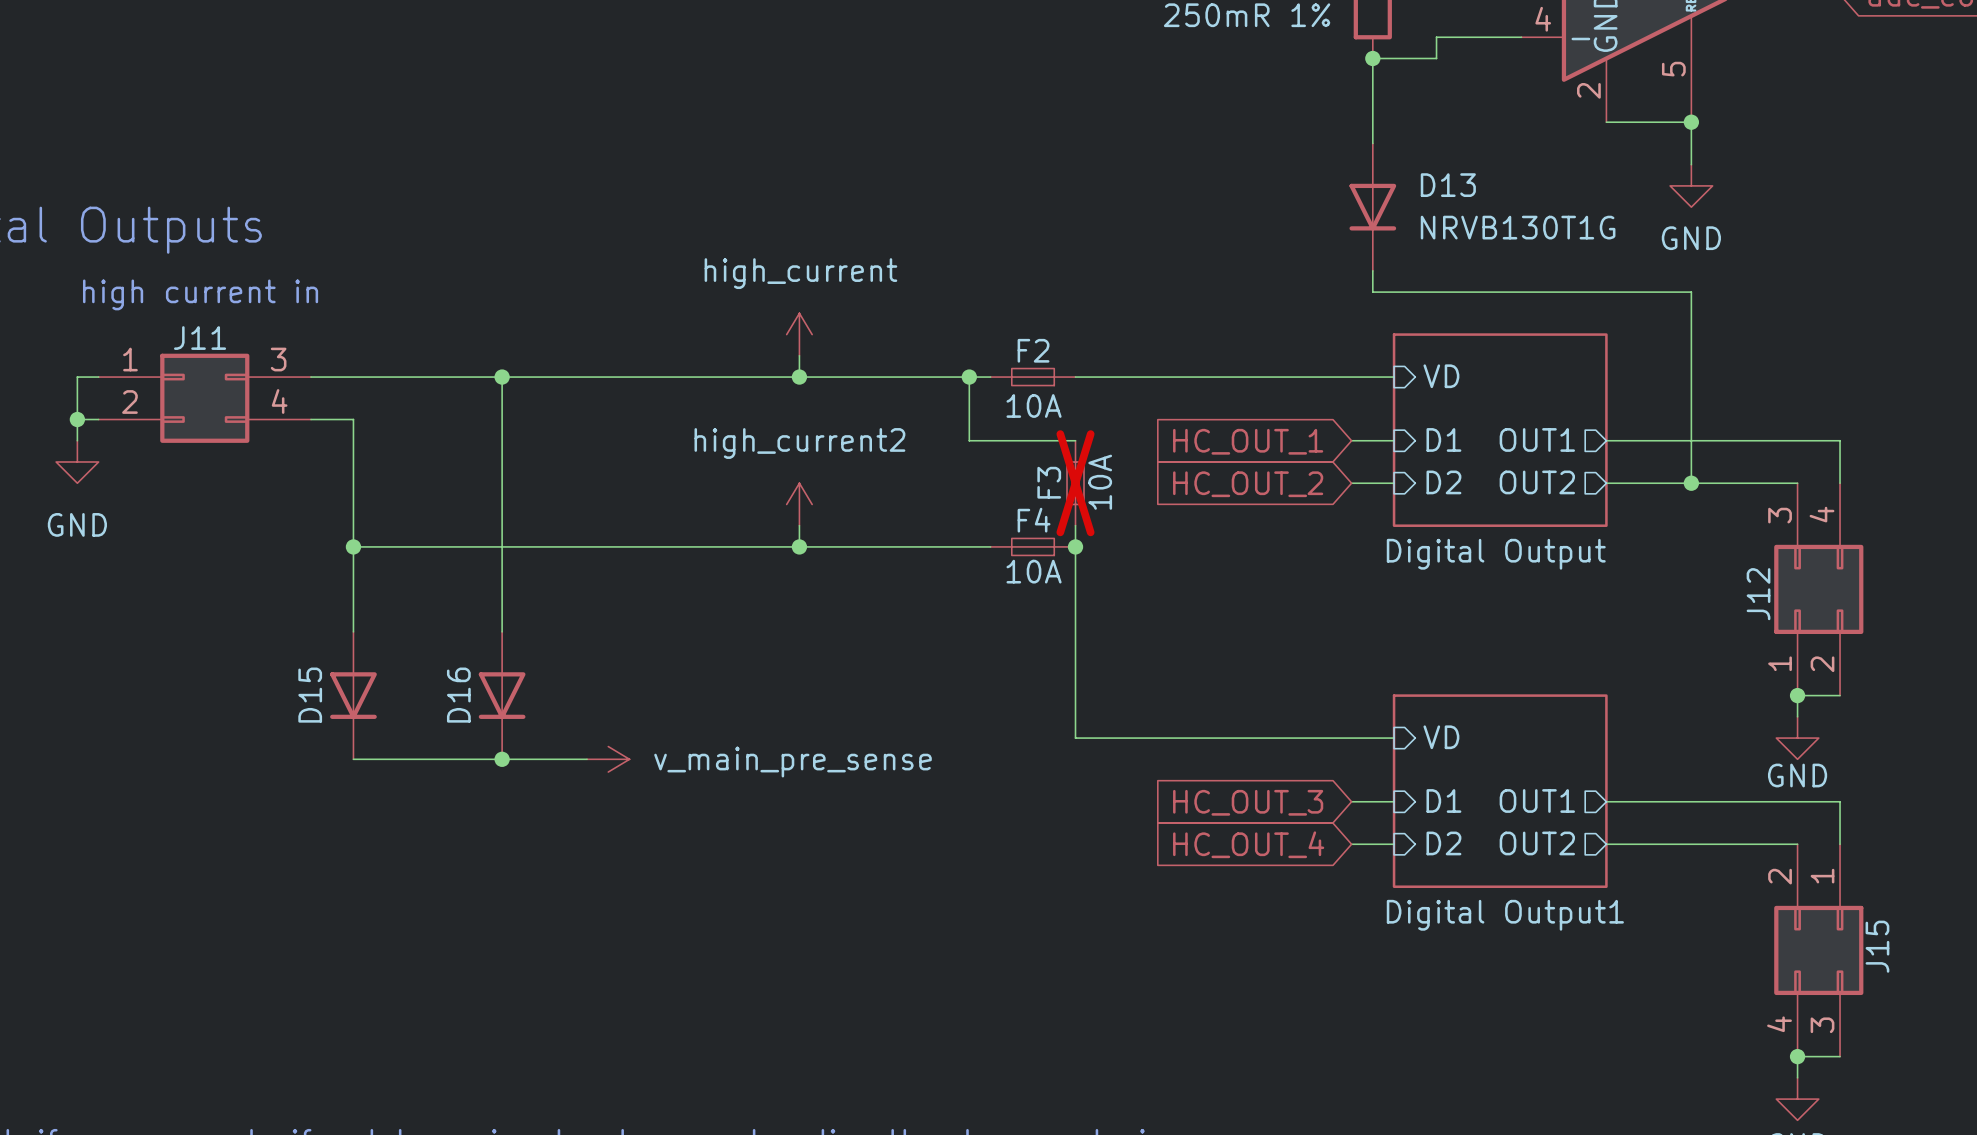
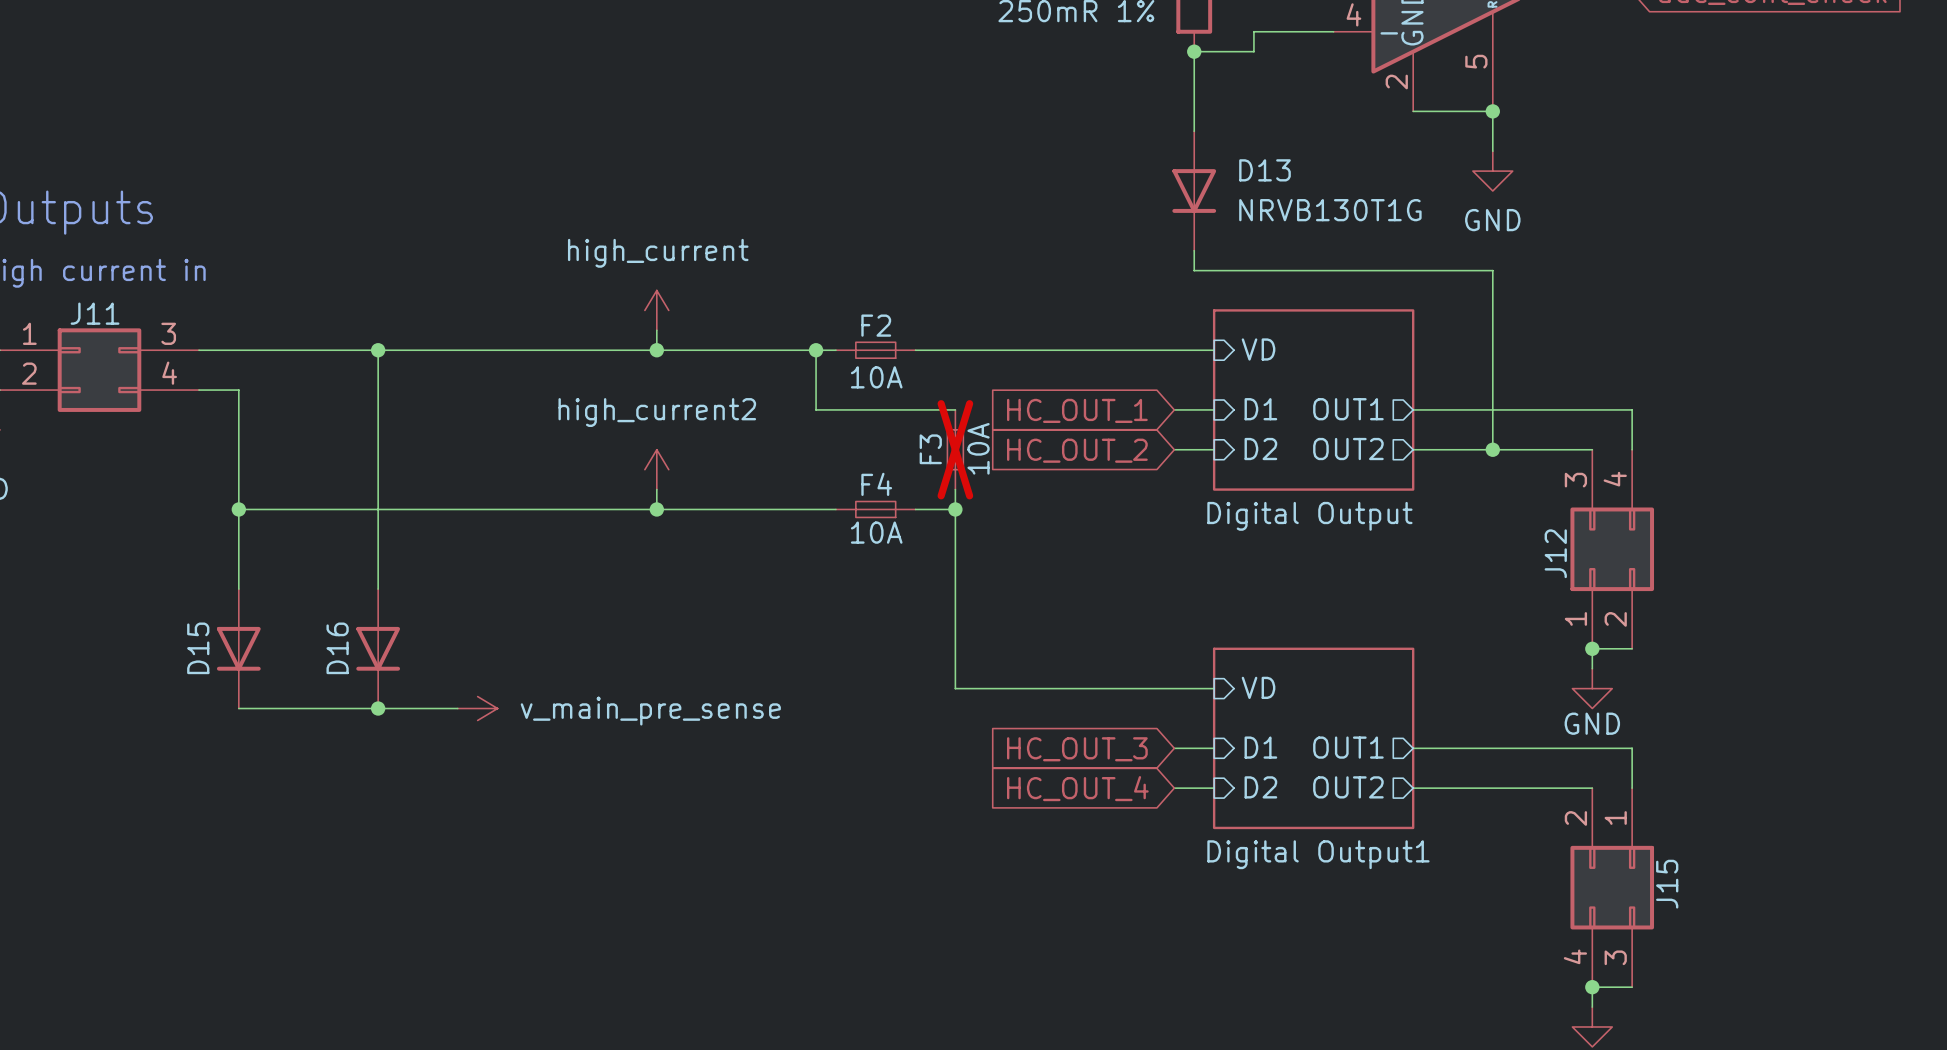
wire: none -> (915, 409) (955, 409)
F3 position: (1075, 483) -> (955, 449)
wire: (1075, 525) (1075, 738) (1117, 738) -> (955, 489) (955, 688)
wire: none -> (915, 509) (955, 509)
junction position: (1075, 546) -> (955, 509)

